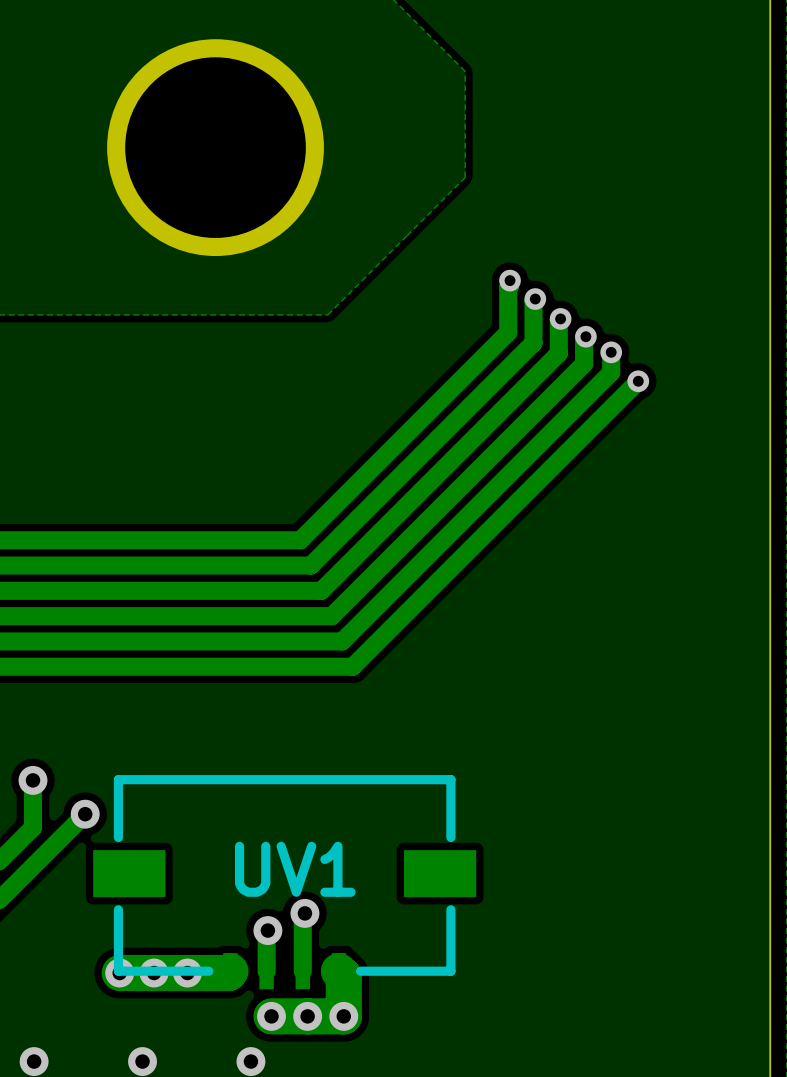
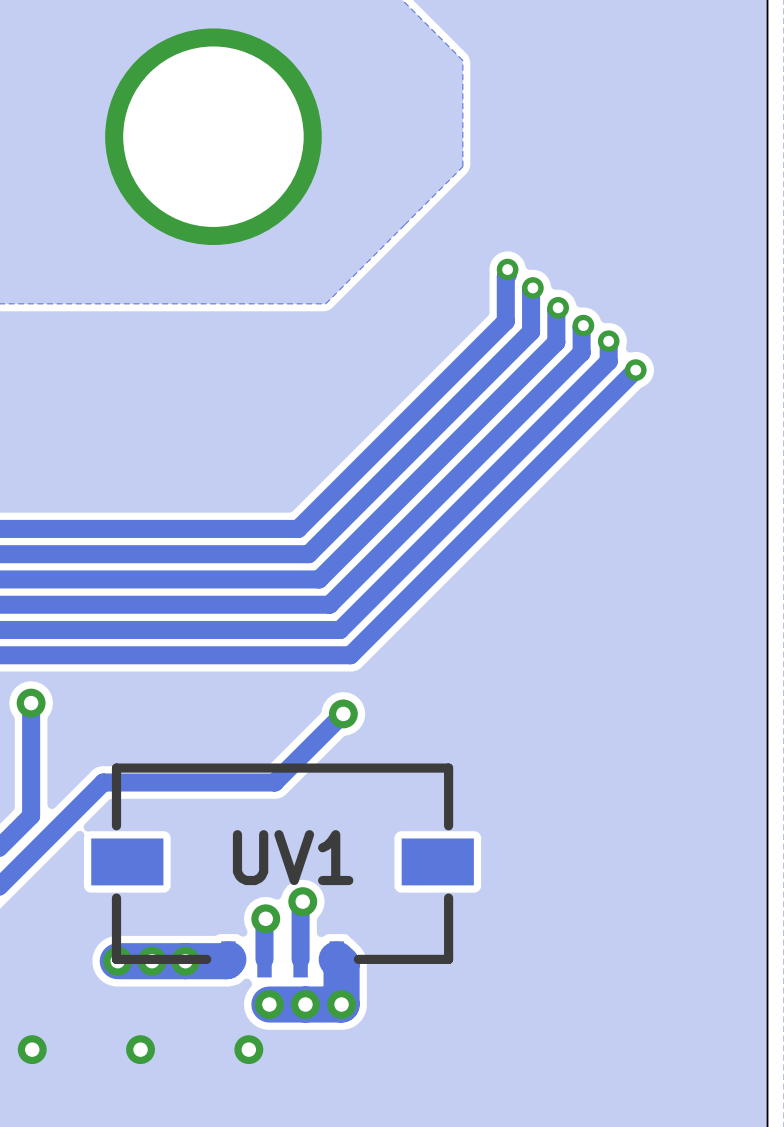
track: none -> (31, 703) (31, 768)
via: none -> (31, 703)
track: none -> (343, 713) (274, 782) (103, 782) (83, 802)
via: none -> (343, 713)
via: (32, 780) -> none
via: (85, 814) -> none

